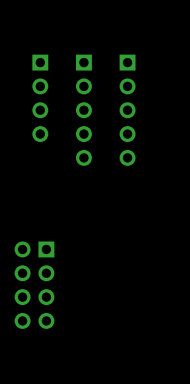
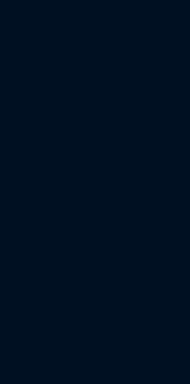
part: (40, 98) -> none
part: (83, 110) -> none
part: (127, 110) -> none
part: (34, 285) -> none

